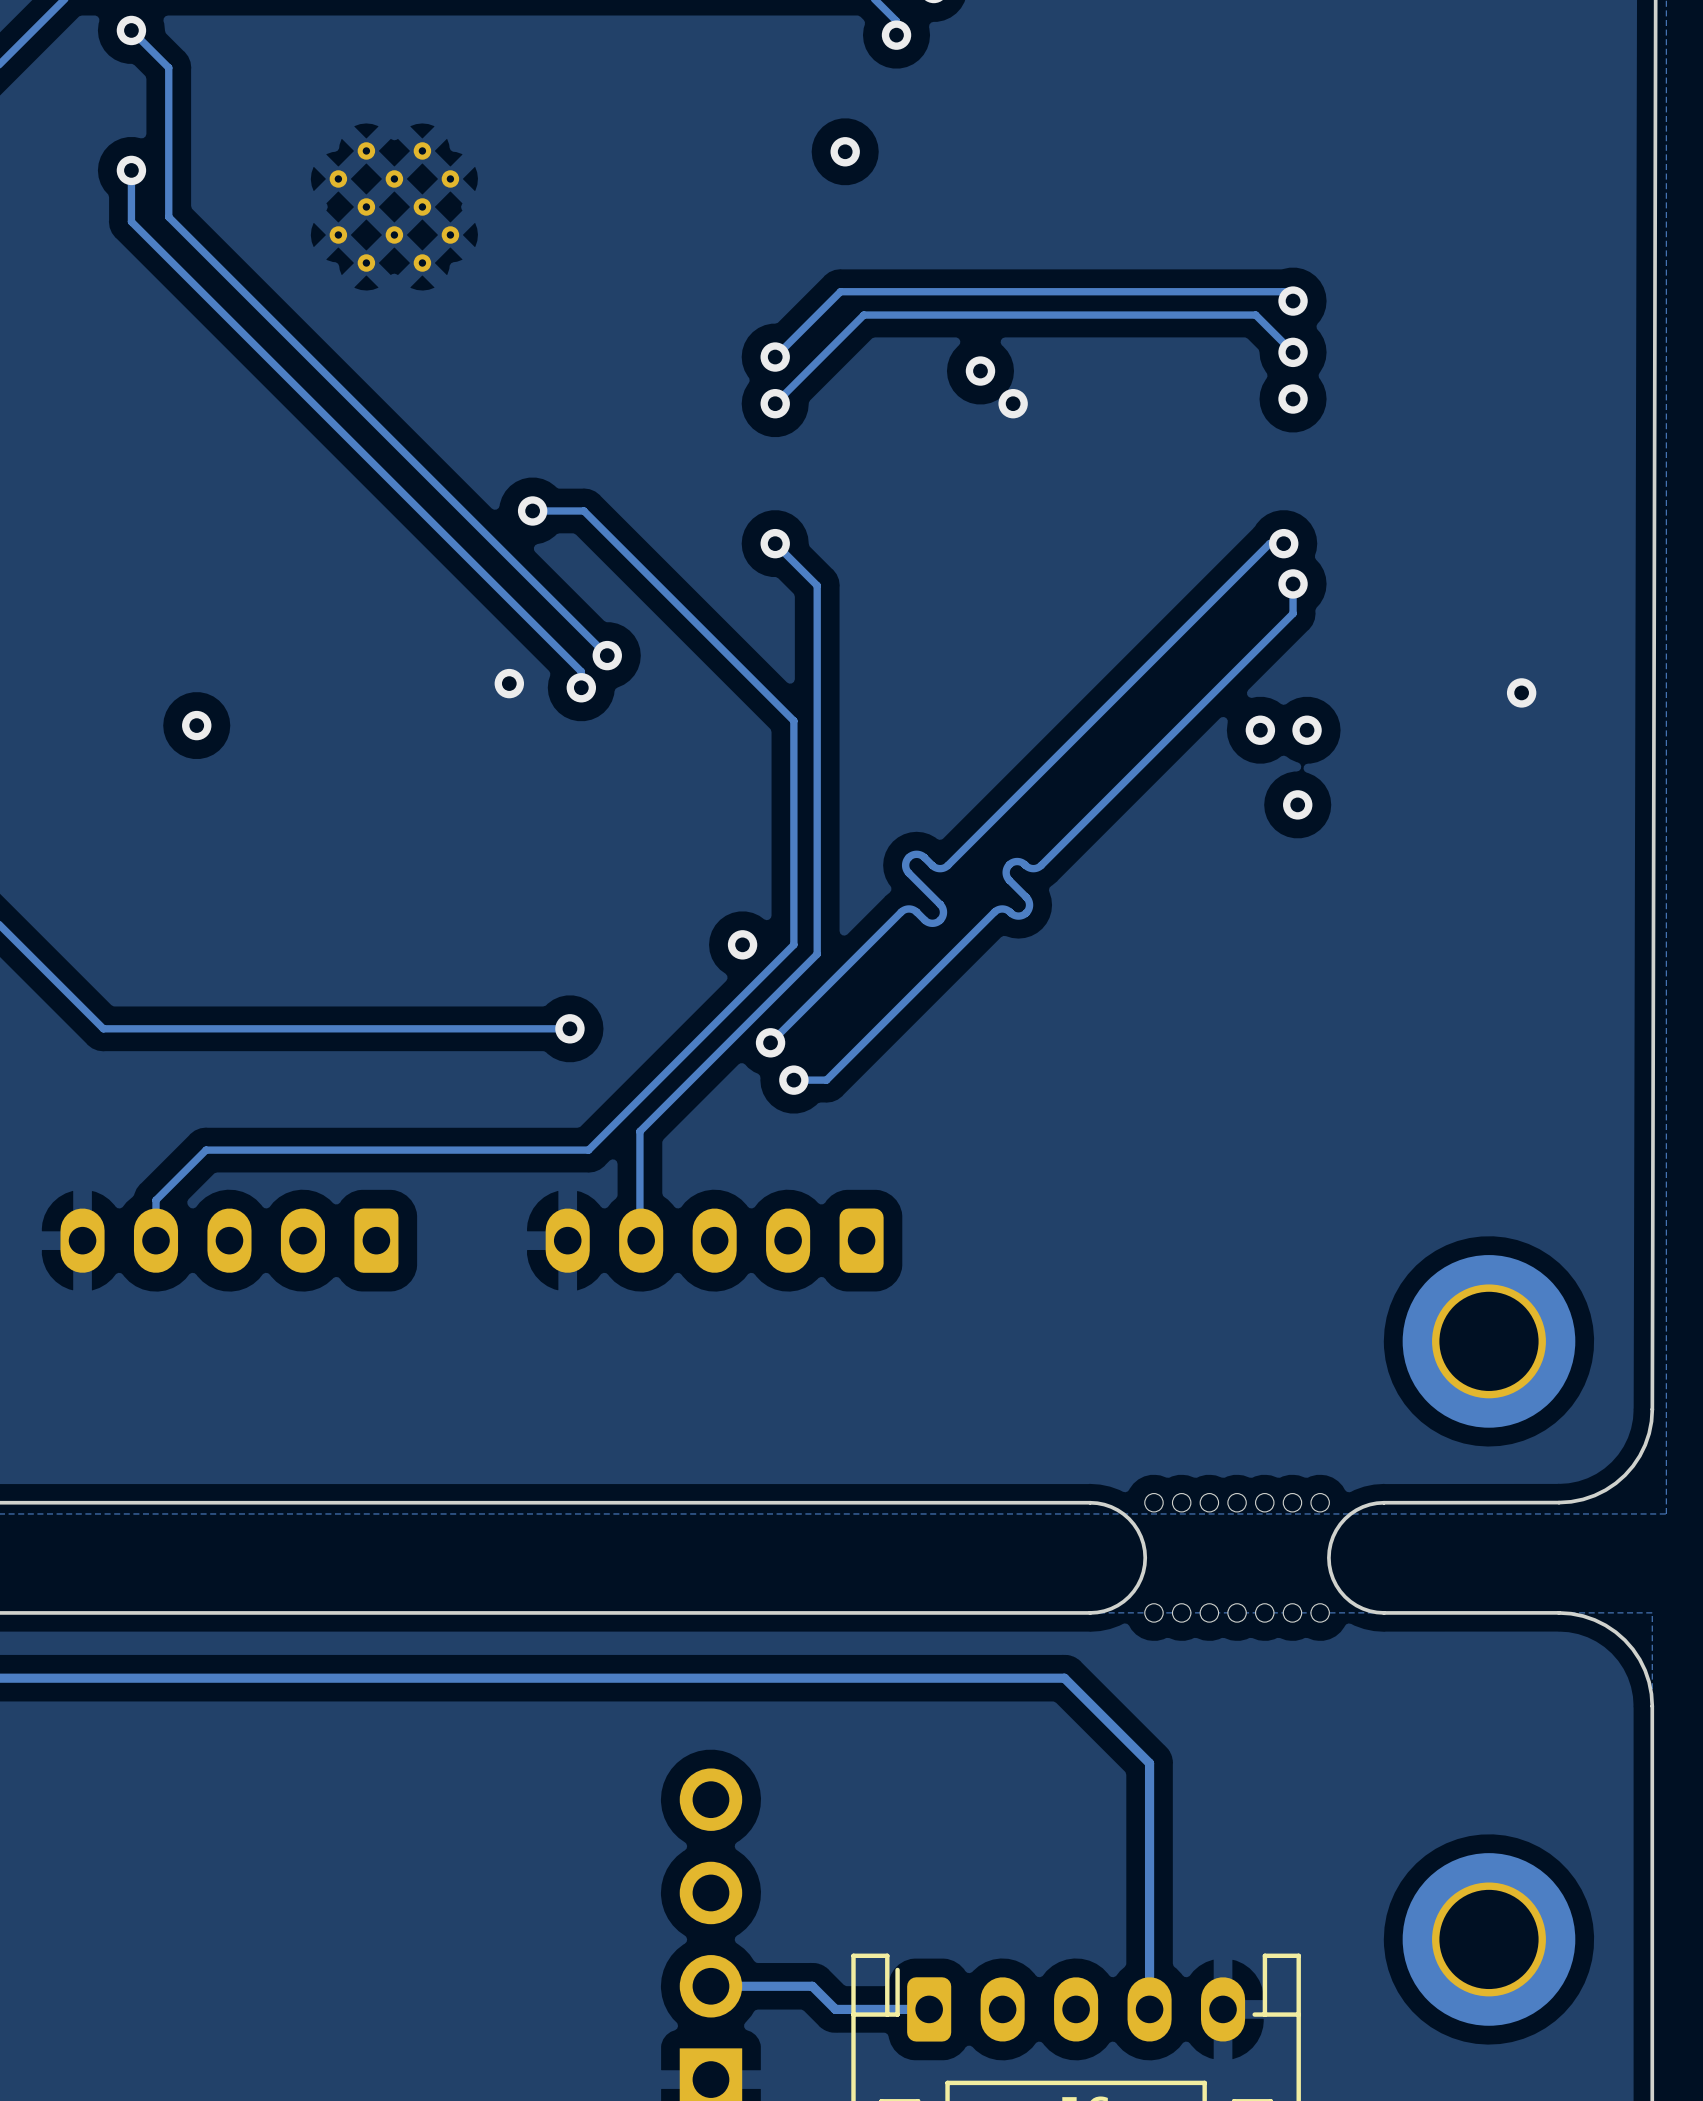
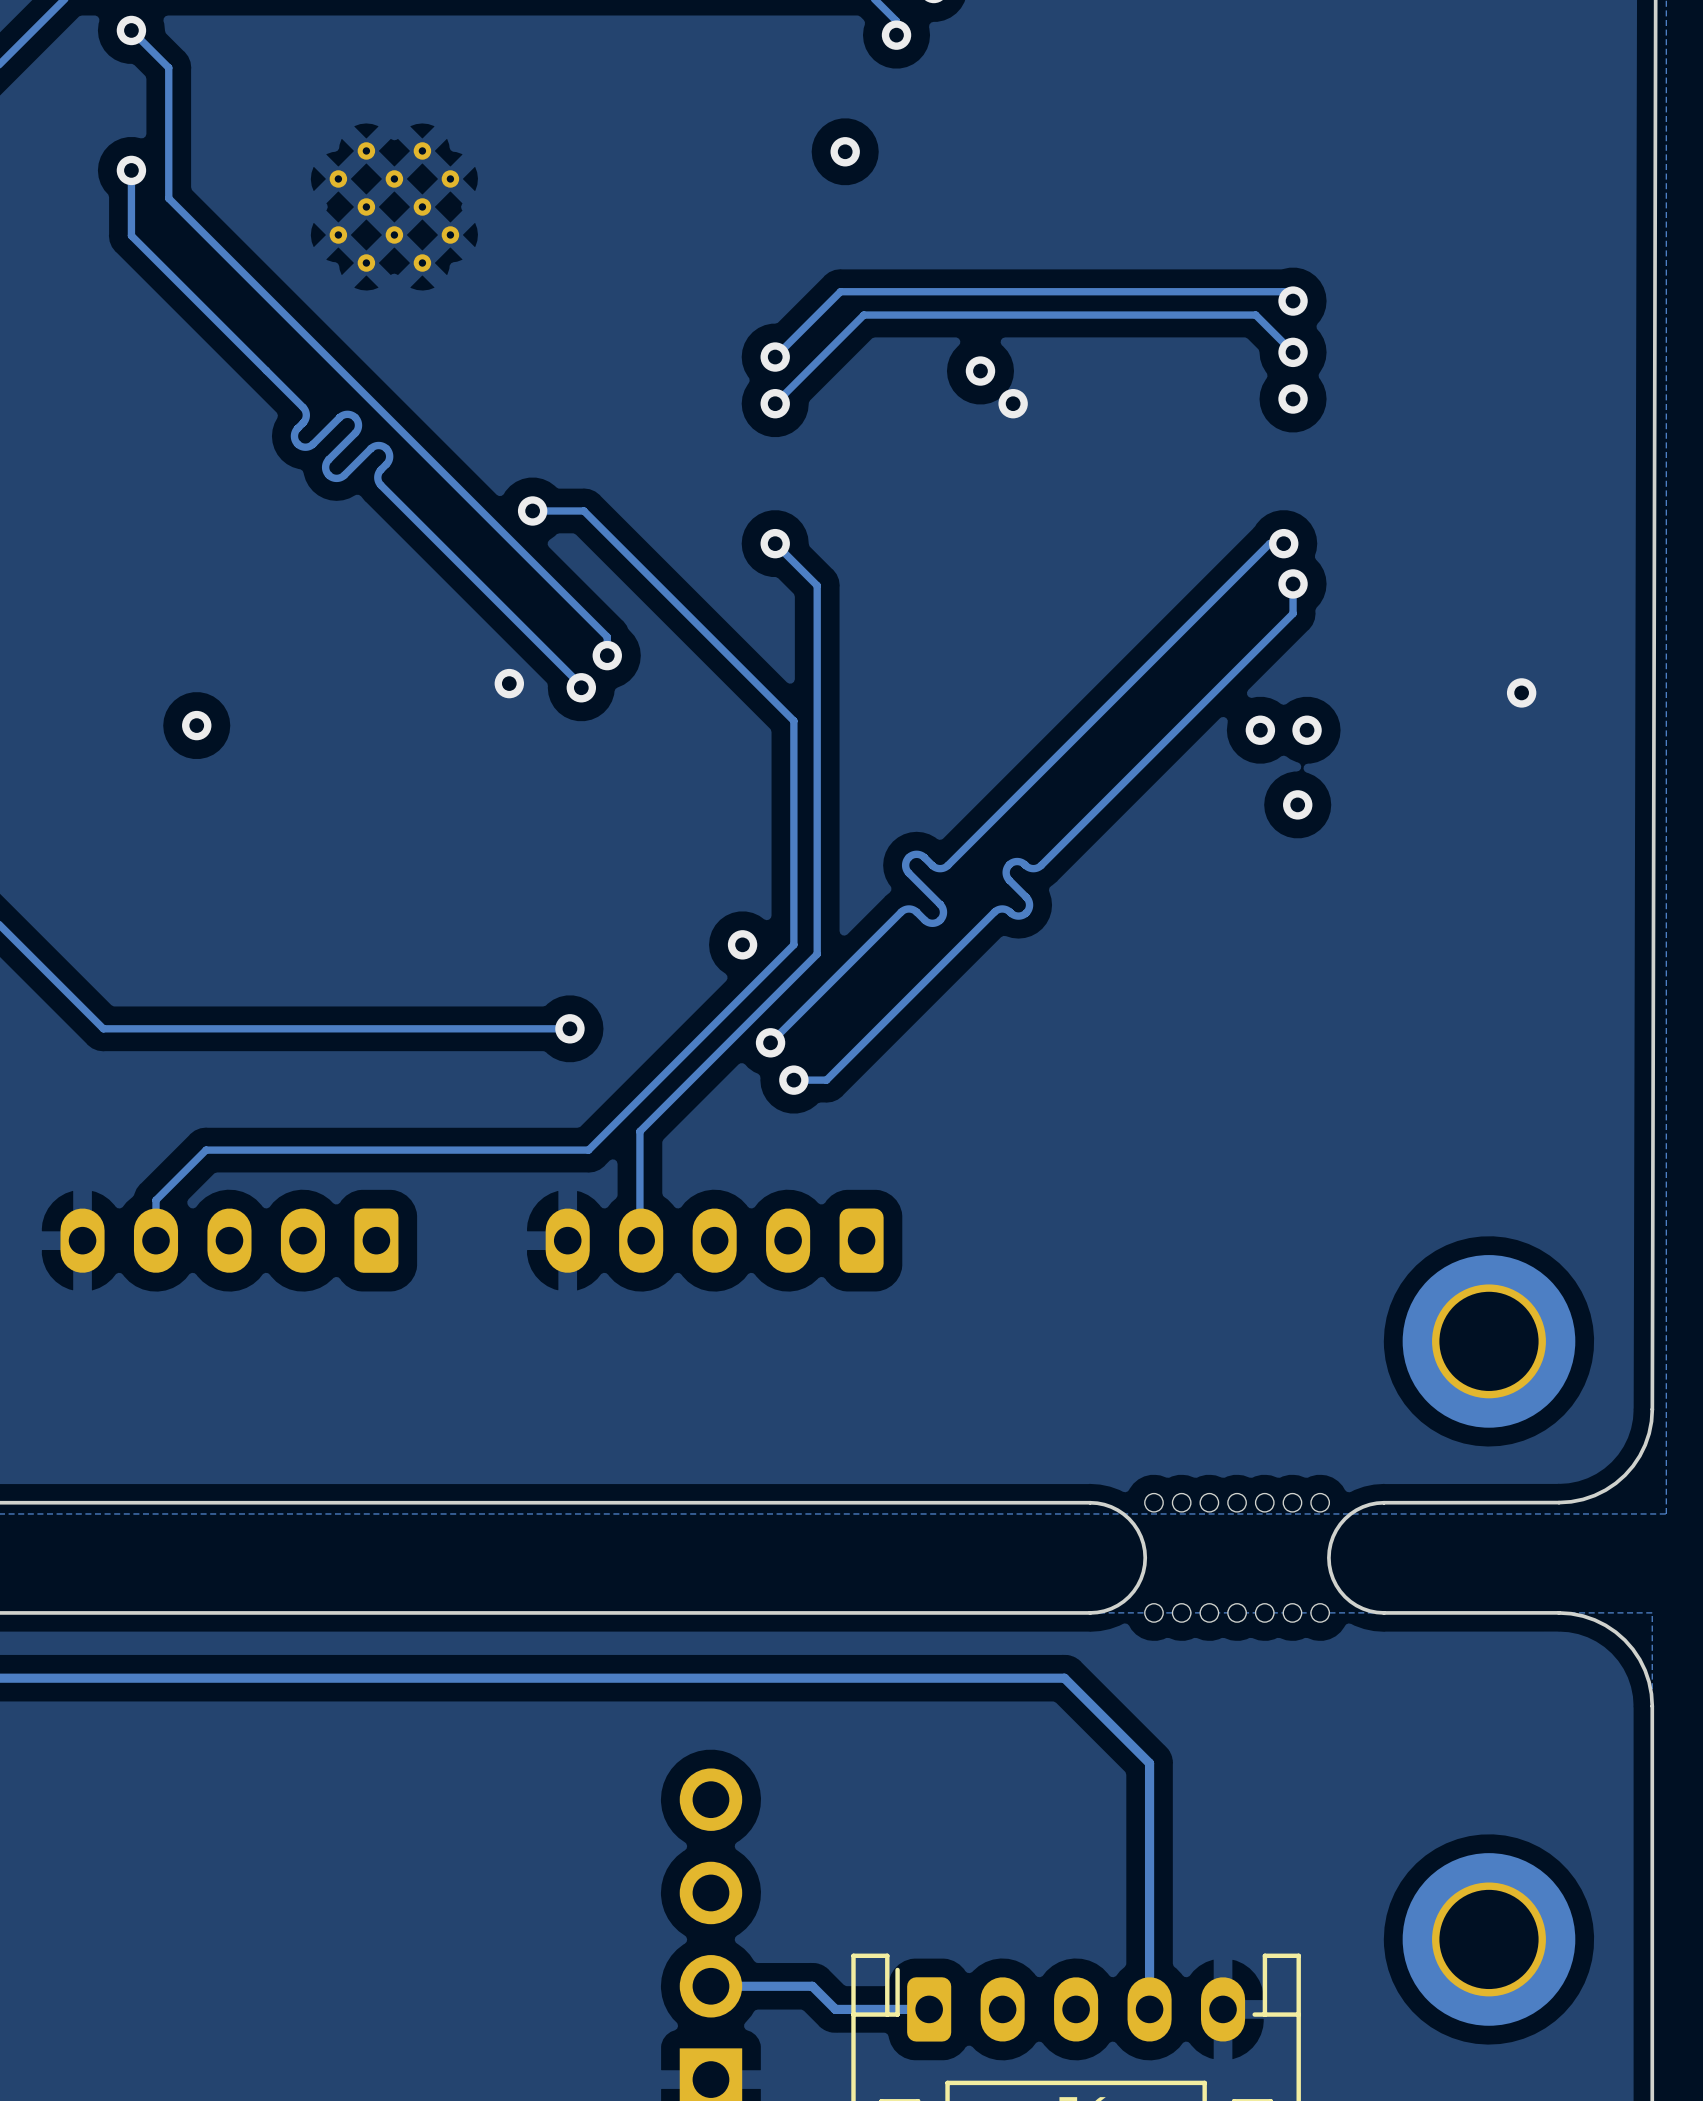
track: (168, 198) (168, 217) (607, 655) -> (168, 198) (607, 636) (607, 655)
track: (131, 221) (581, 671) (581, 685) -> (131, 221) (131, 235) (303, 408) (305, 418) (294, 434) (297, 444) (303, 446) (310, 446) (341, 416) (347, 414) (354, 416) (358, 422) (357, 430) (327, 460) (325, 467) (327, 474) (334, 478) (341, 477) (372, 447) (379, 445) (385, 447) (389, 457) (378, 473) (380, 484) (581, 685)

